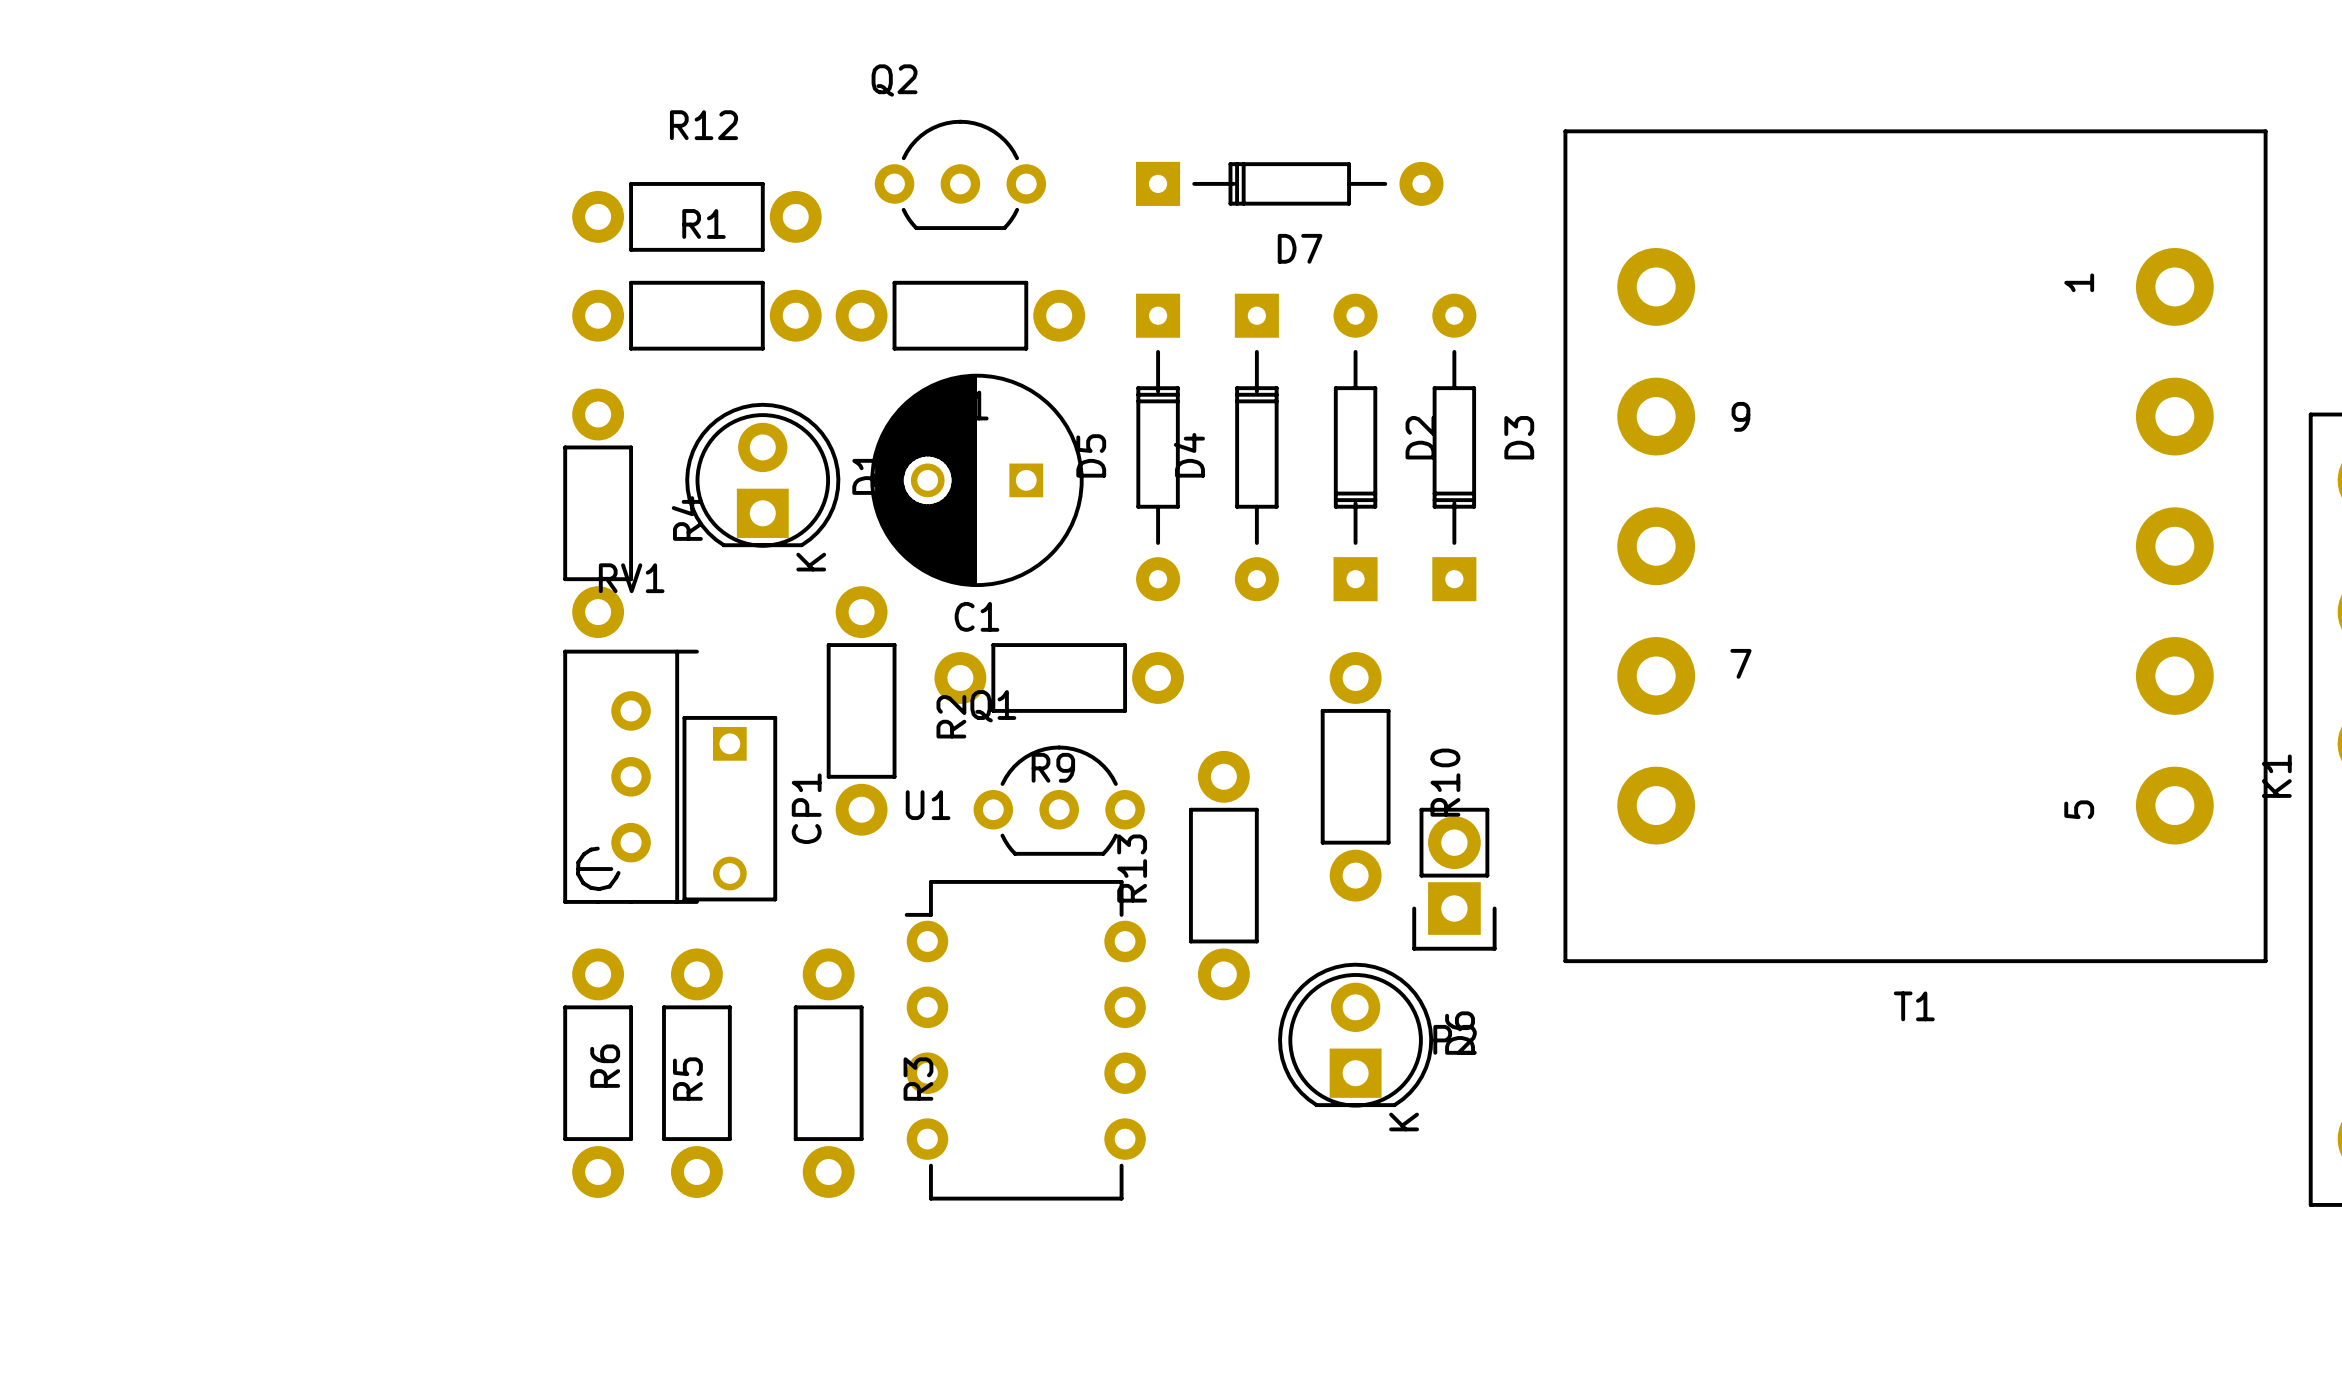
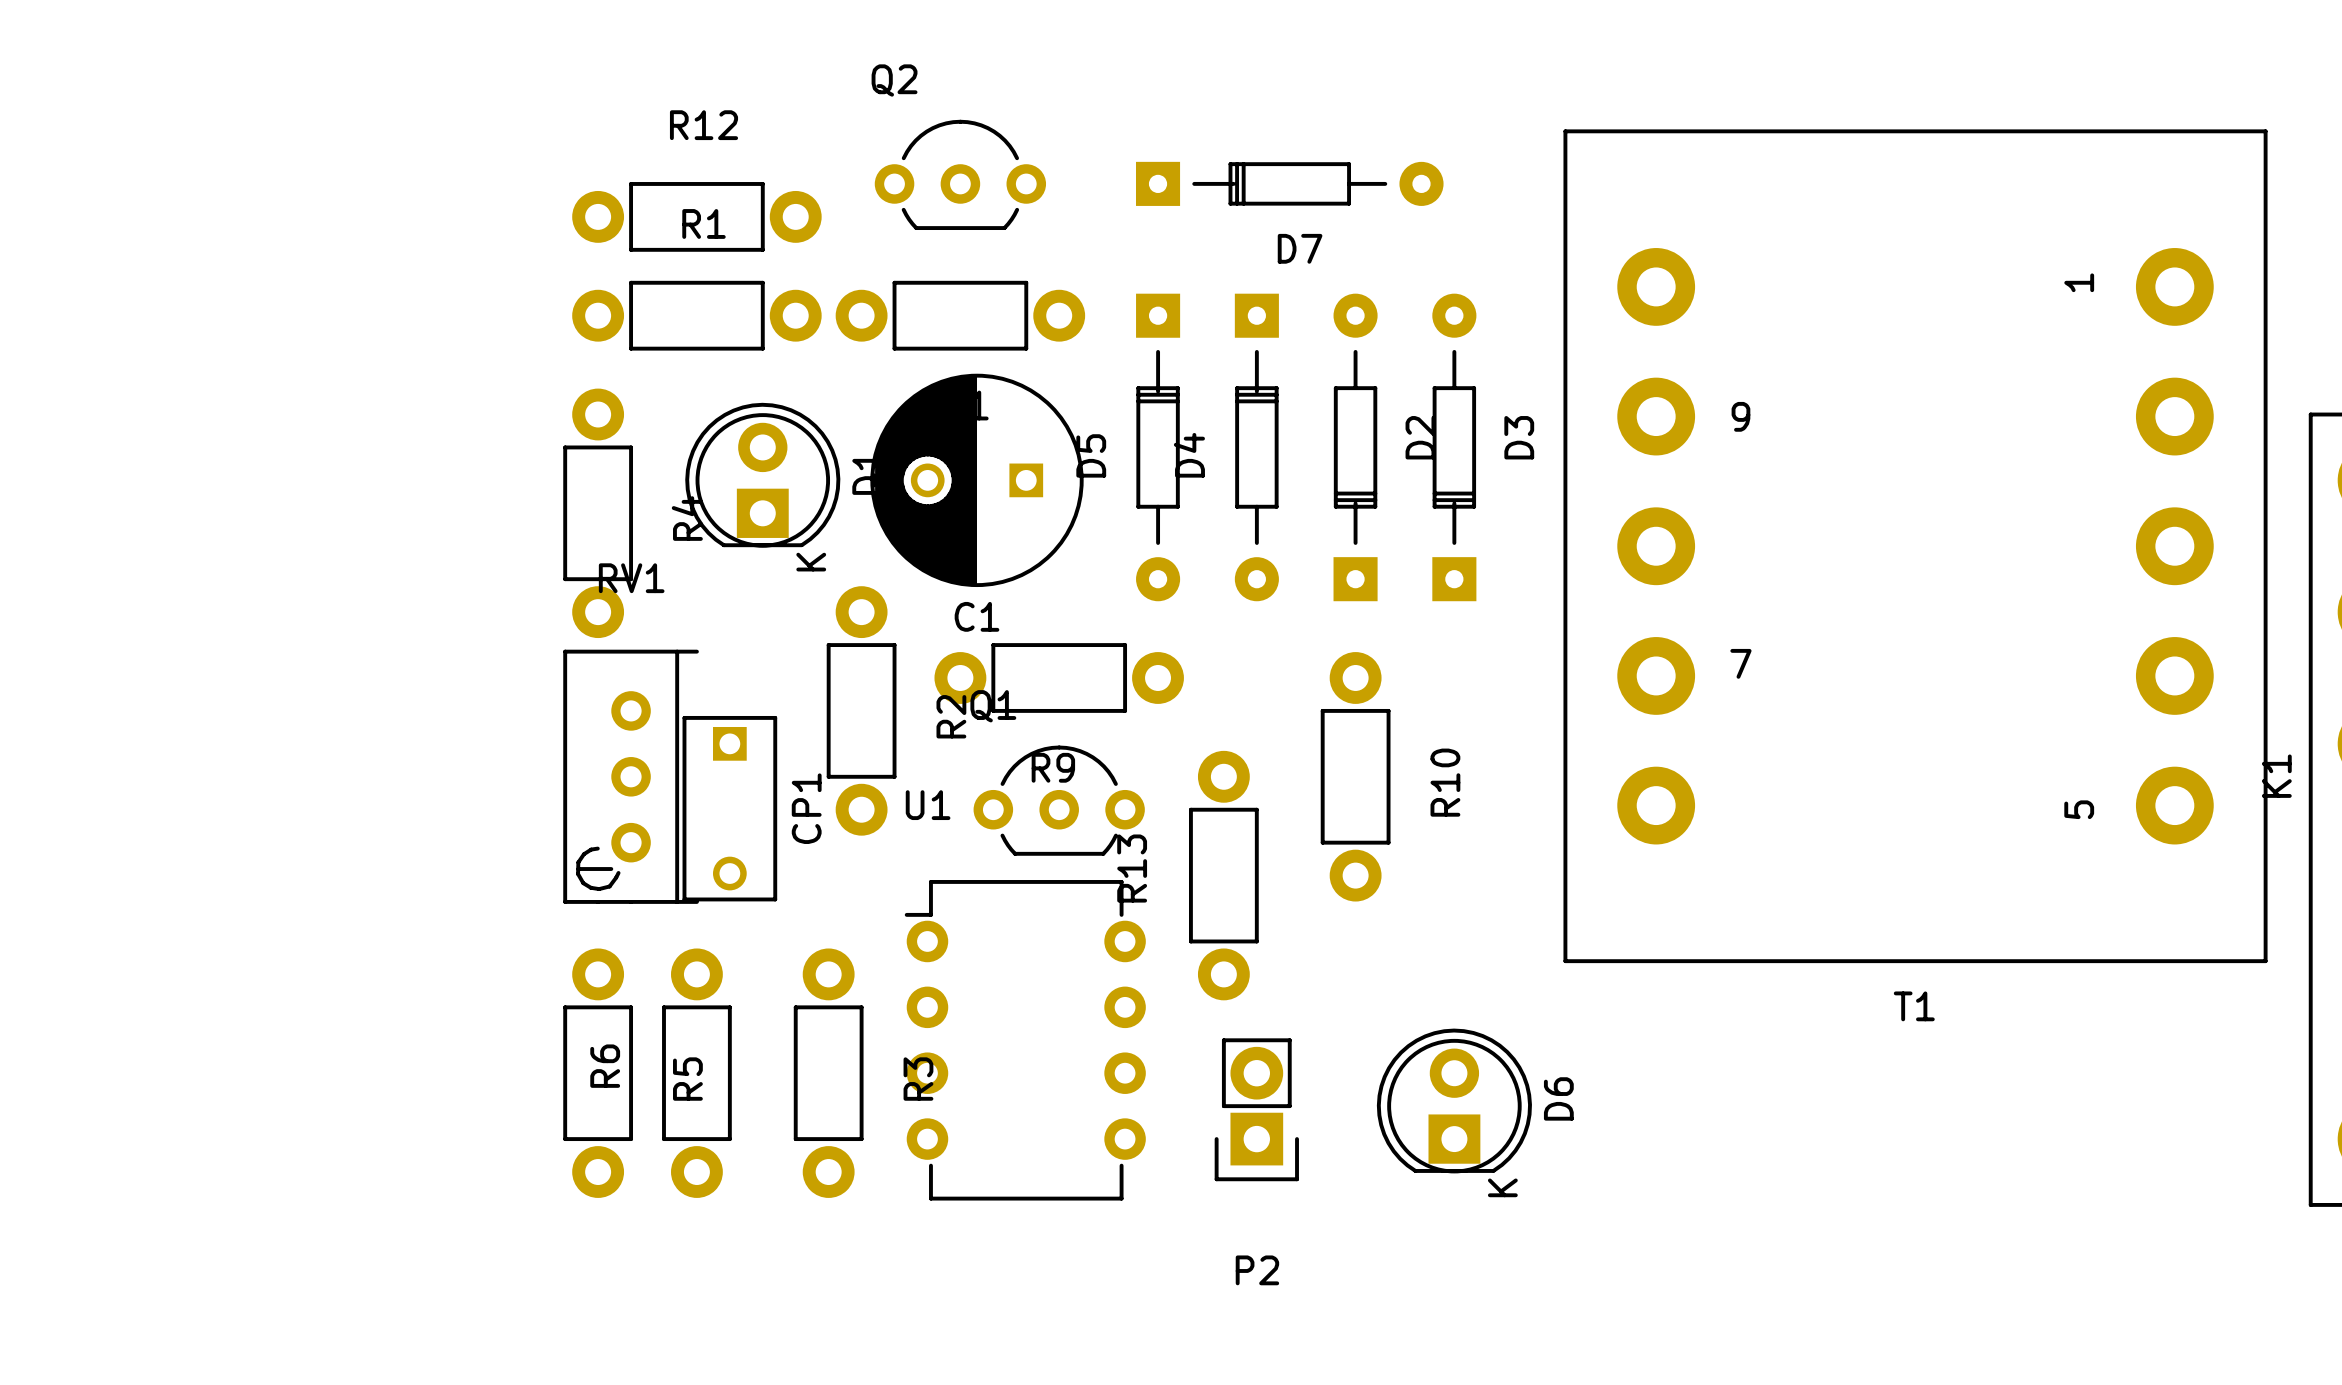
P2 position: (1454, 879) -> (1256, 1109)
D6 position: (1355, 1035) -> (1454, 1100)

